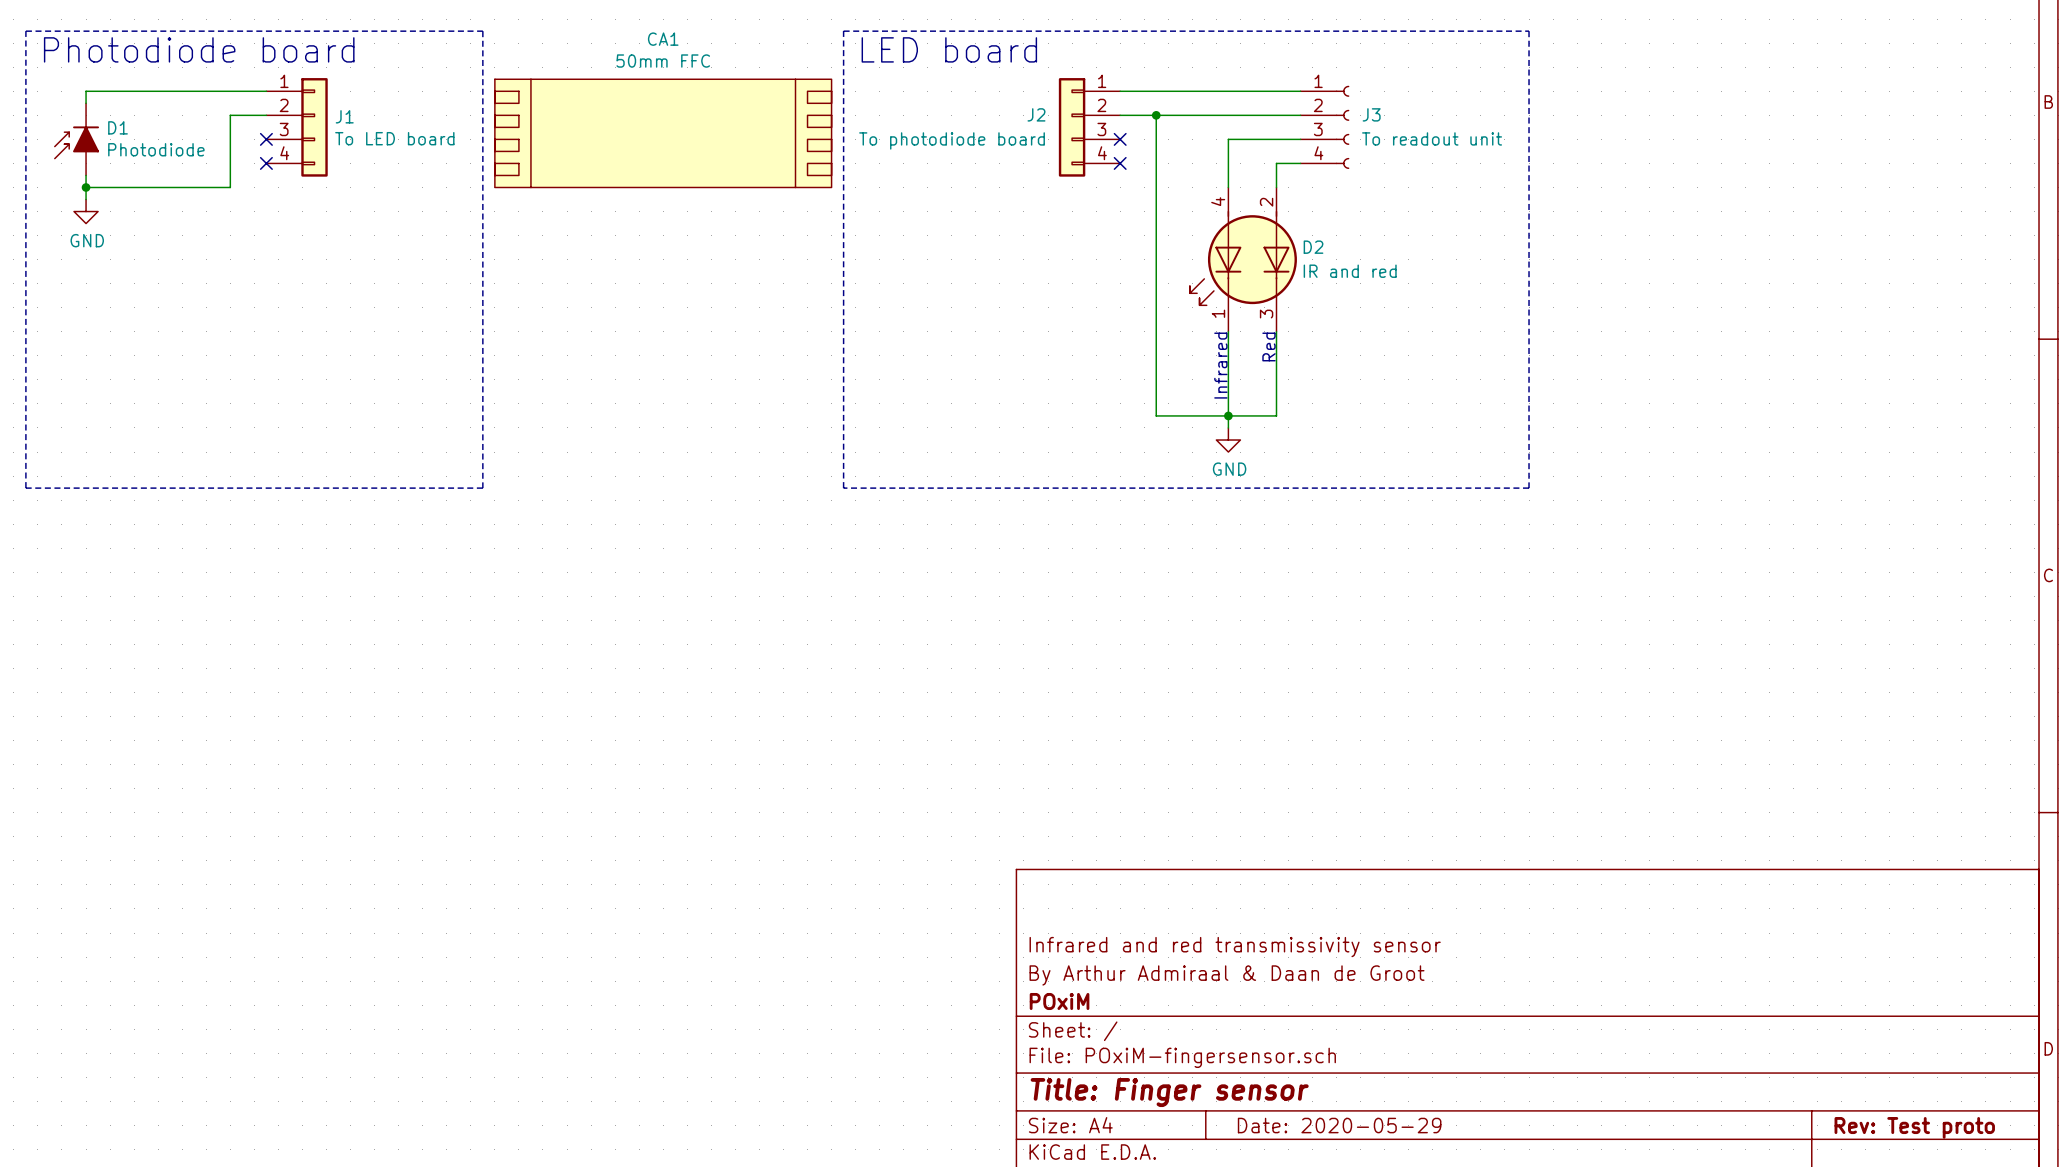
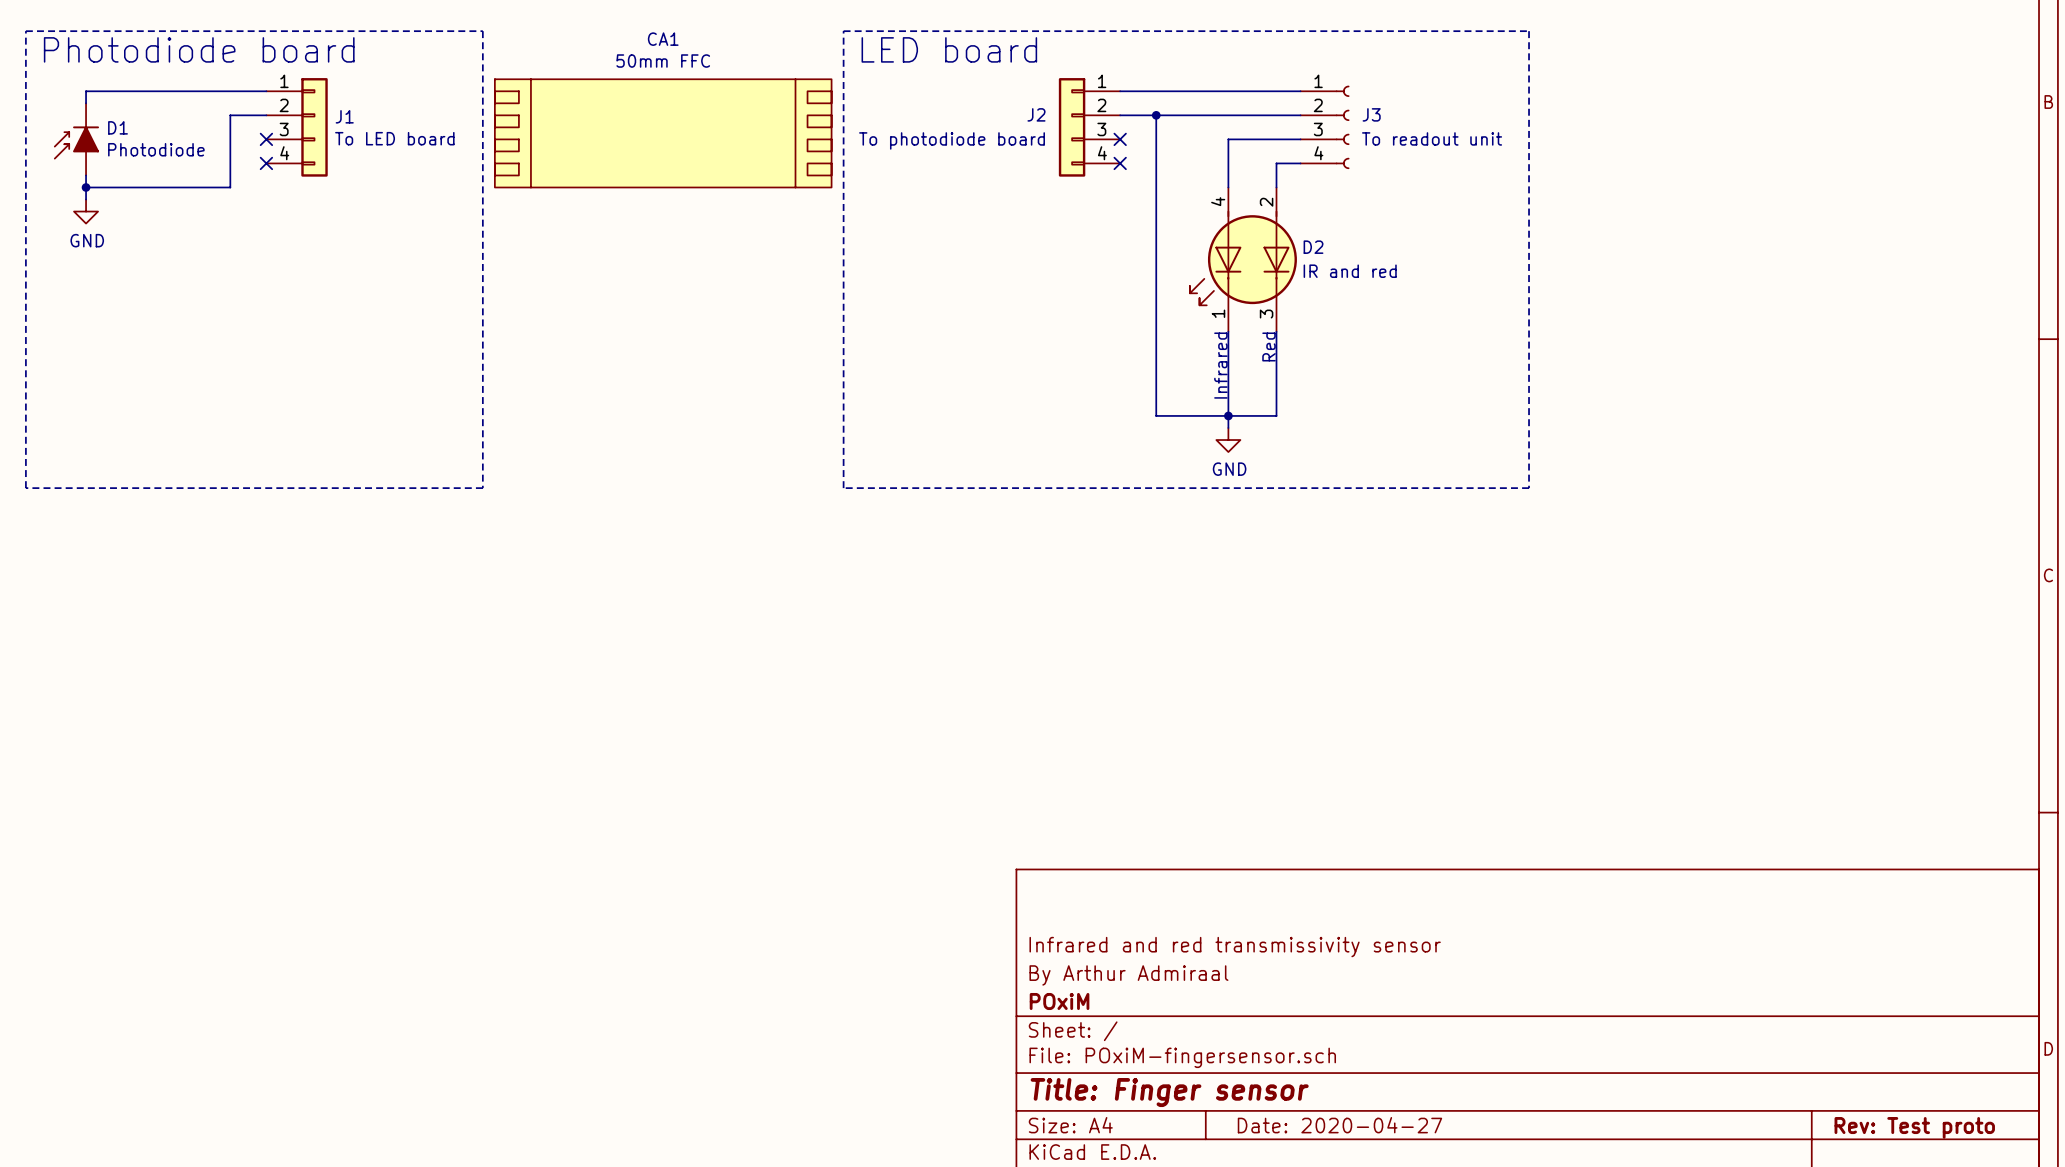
title block: By Arthur Admiraal & Daan de Groot (1227, 975) -> By Arthur Admiraal (1128, 975)
title block: Date: 2020-05-29 (1339, 1125) -> Date: 2020-04-27 (1339, 1125)

